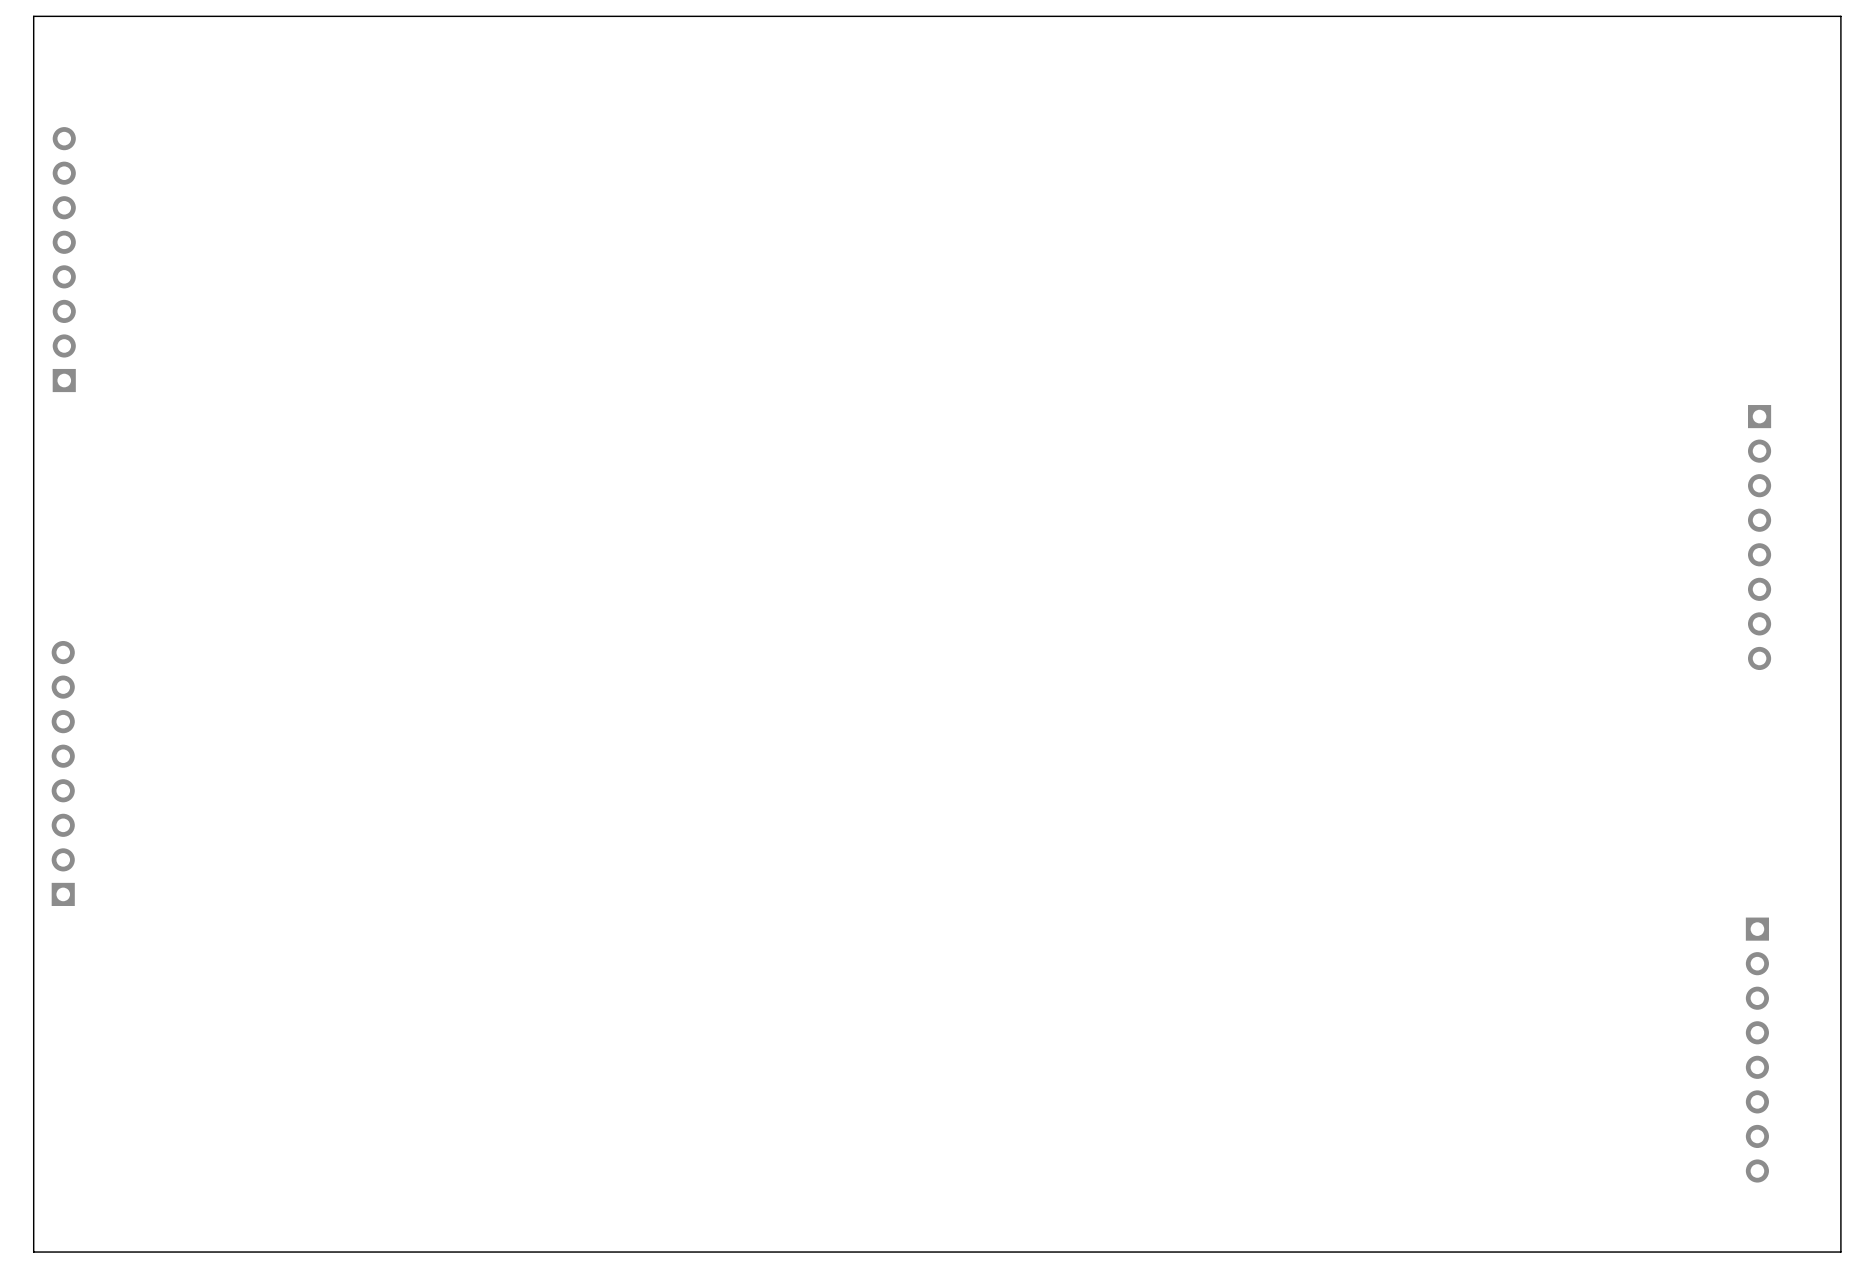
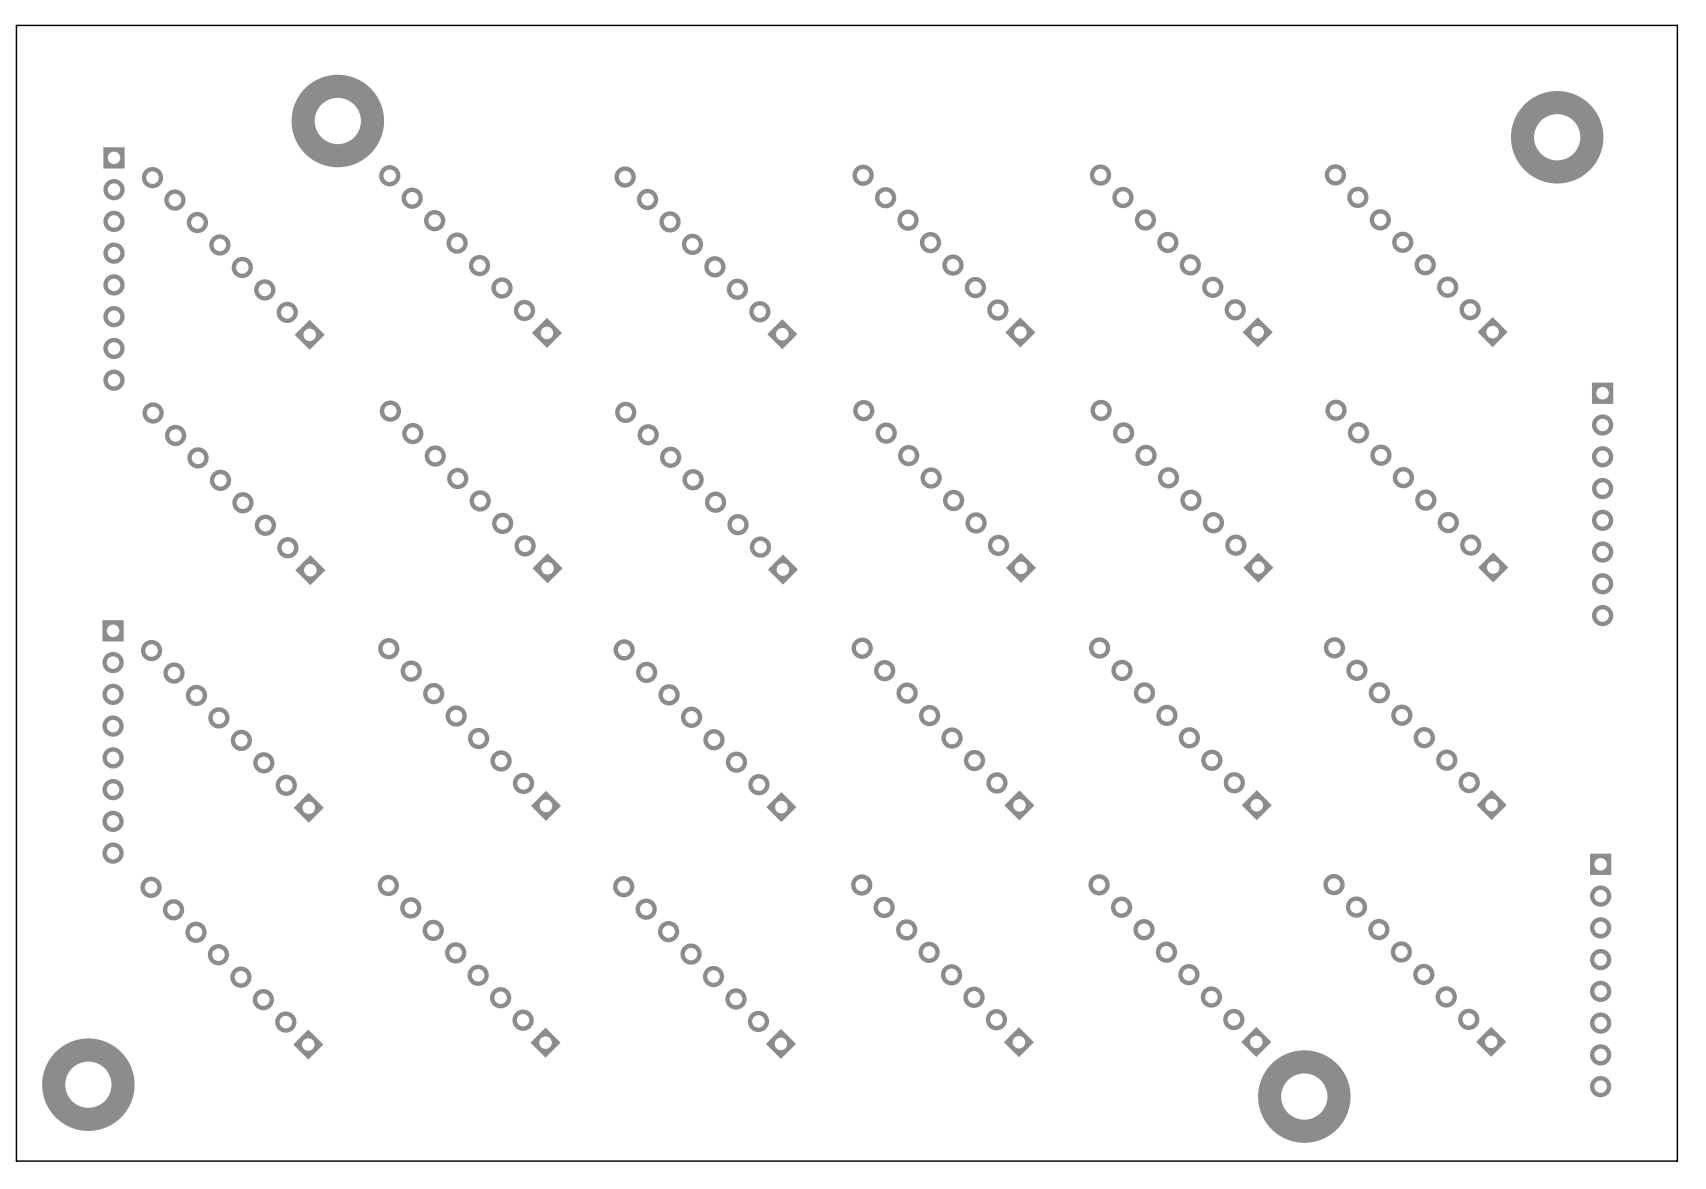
part: none -> (337, 121)
part: none -> (1557, 137)
part rotation: 0° (64, 259) -> 180° (114, 269)
part: none -> (1416, 255)
part: none -> (470, 256)
part: none -> (943, 256)
part: none -> (1181, 255)
part: none -> (233, 258)
part: none -> (705, 257)
part: none -> (471, 491)
part: none -> (944, 491)
part: none -> (1181, 491)
part: none -> (1416, 491)
part: none -> (233, 493)
part: none -> (706, 493)
part rotation: 0° (63, 773) -> 180° (113, 741)
part: none -> (943, 729)
part: none -> (1180, 728)
part: none -> (1415, 728)
part: none -> (469, 729)
part: none -> (704, 730)
part: none -> (232, 731)
part: none -> (942, 965)
part: none -> (1179, 965)
part: none -> (1414, 965)
part: none -> (469, 966)
part: none -> (704, 967)
part: none -> (231, 968)
part: none -> (88, 1084)
part: none -> (1304, 1096)

